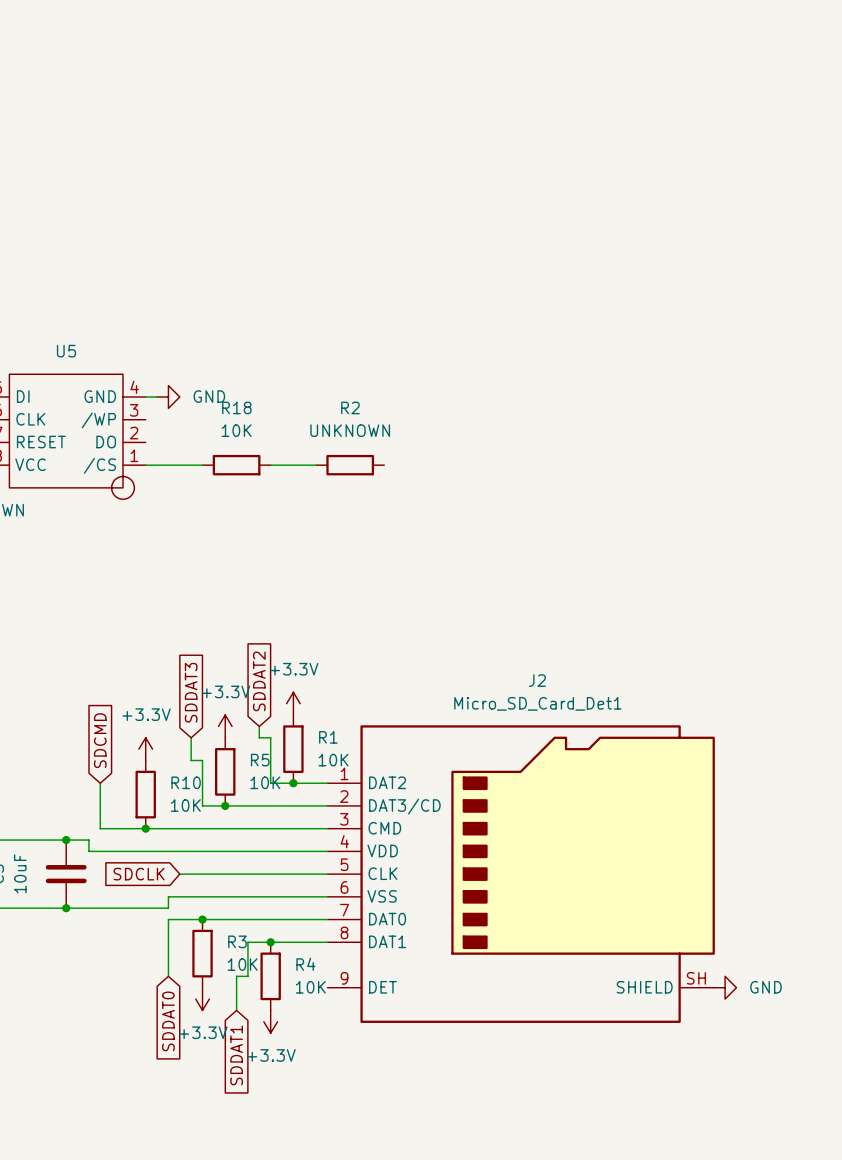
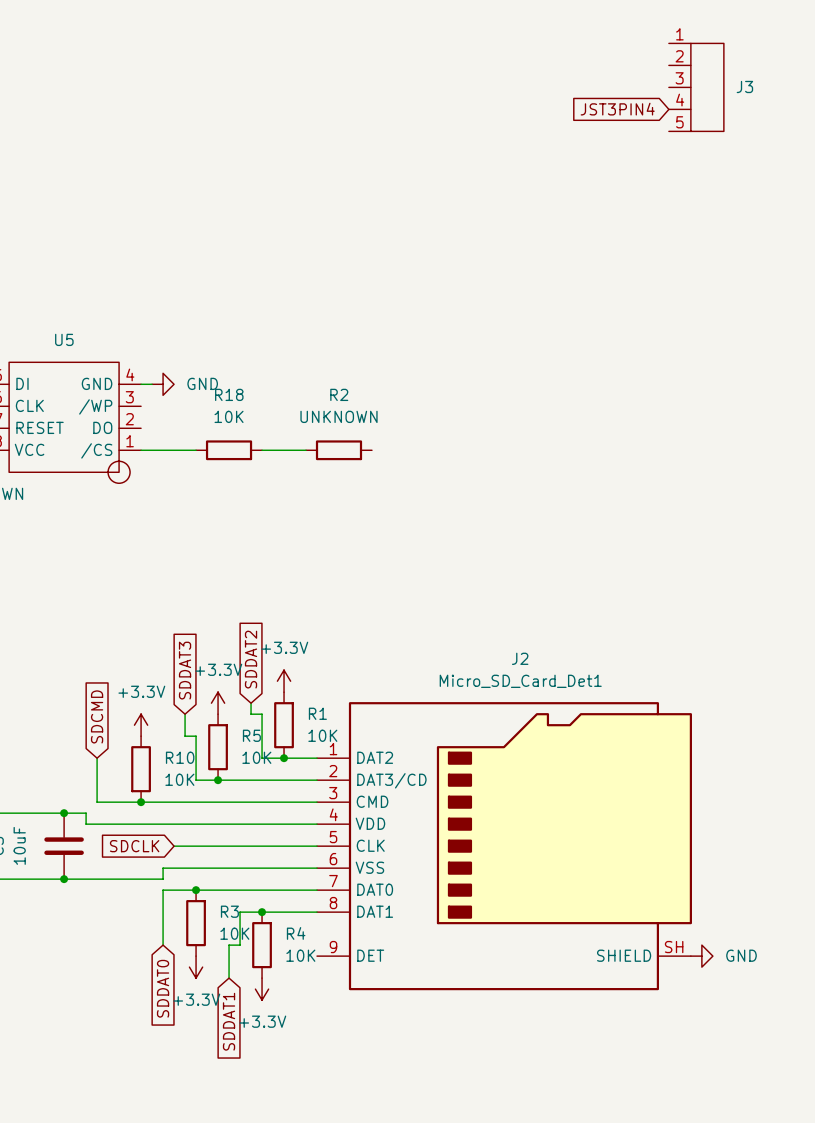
J3: none -> (696, 87)
global label: none -> JST3PIN4 (617, 109)

